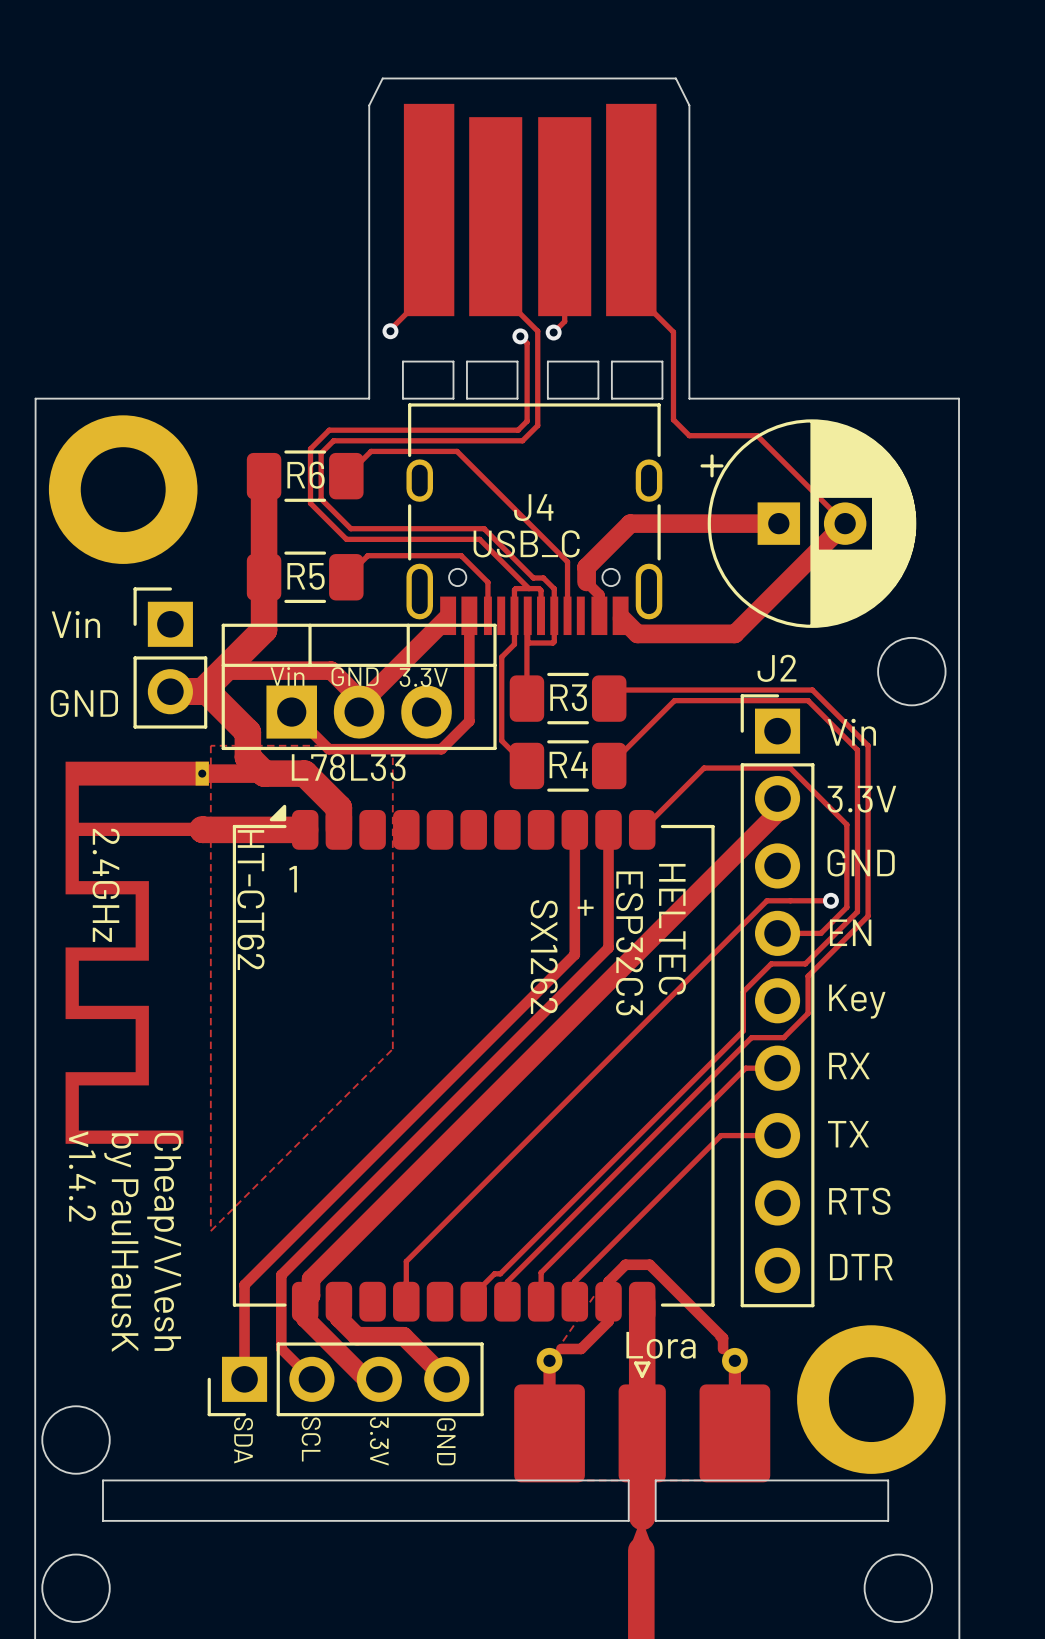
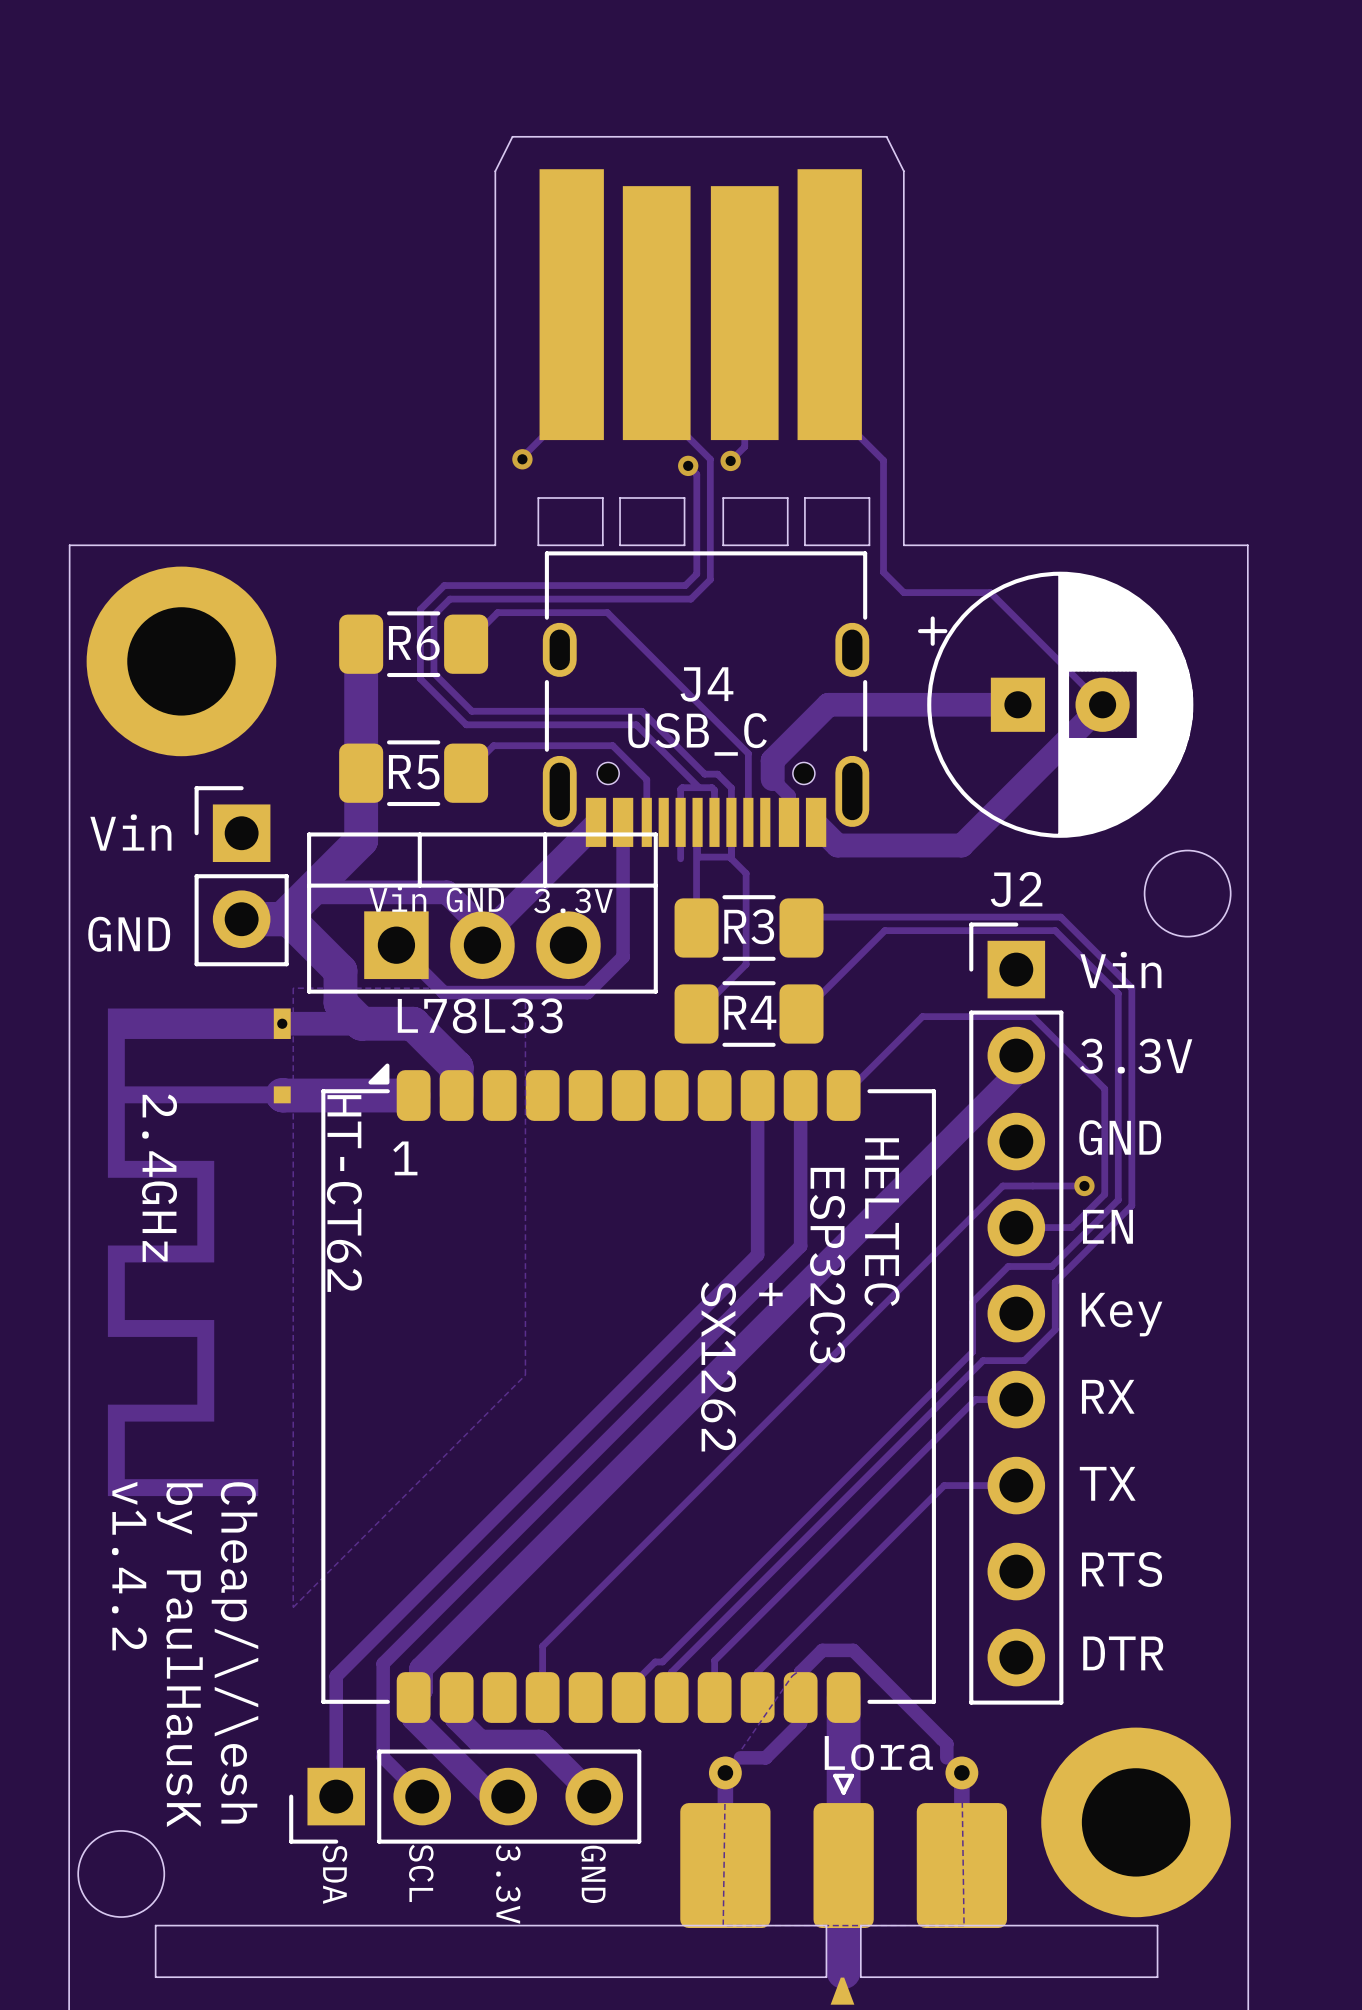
track: (514, 644) (501, 657) (501, 740) (526, 765) -> (731, 855) (731, 858) (746, 873) (746, 964) (696, 1013)

